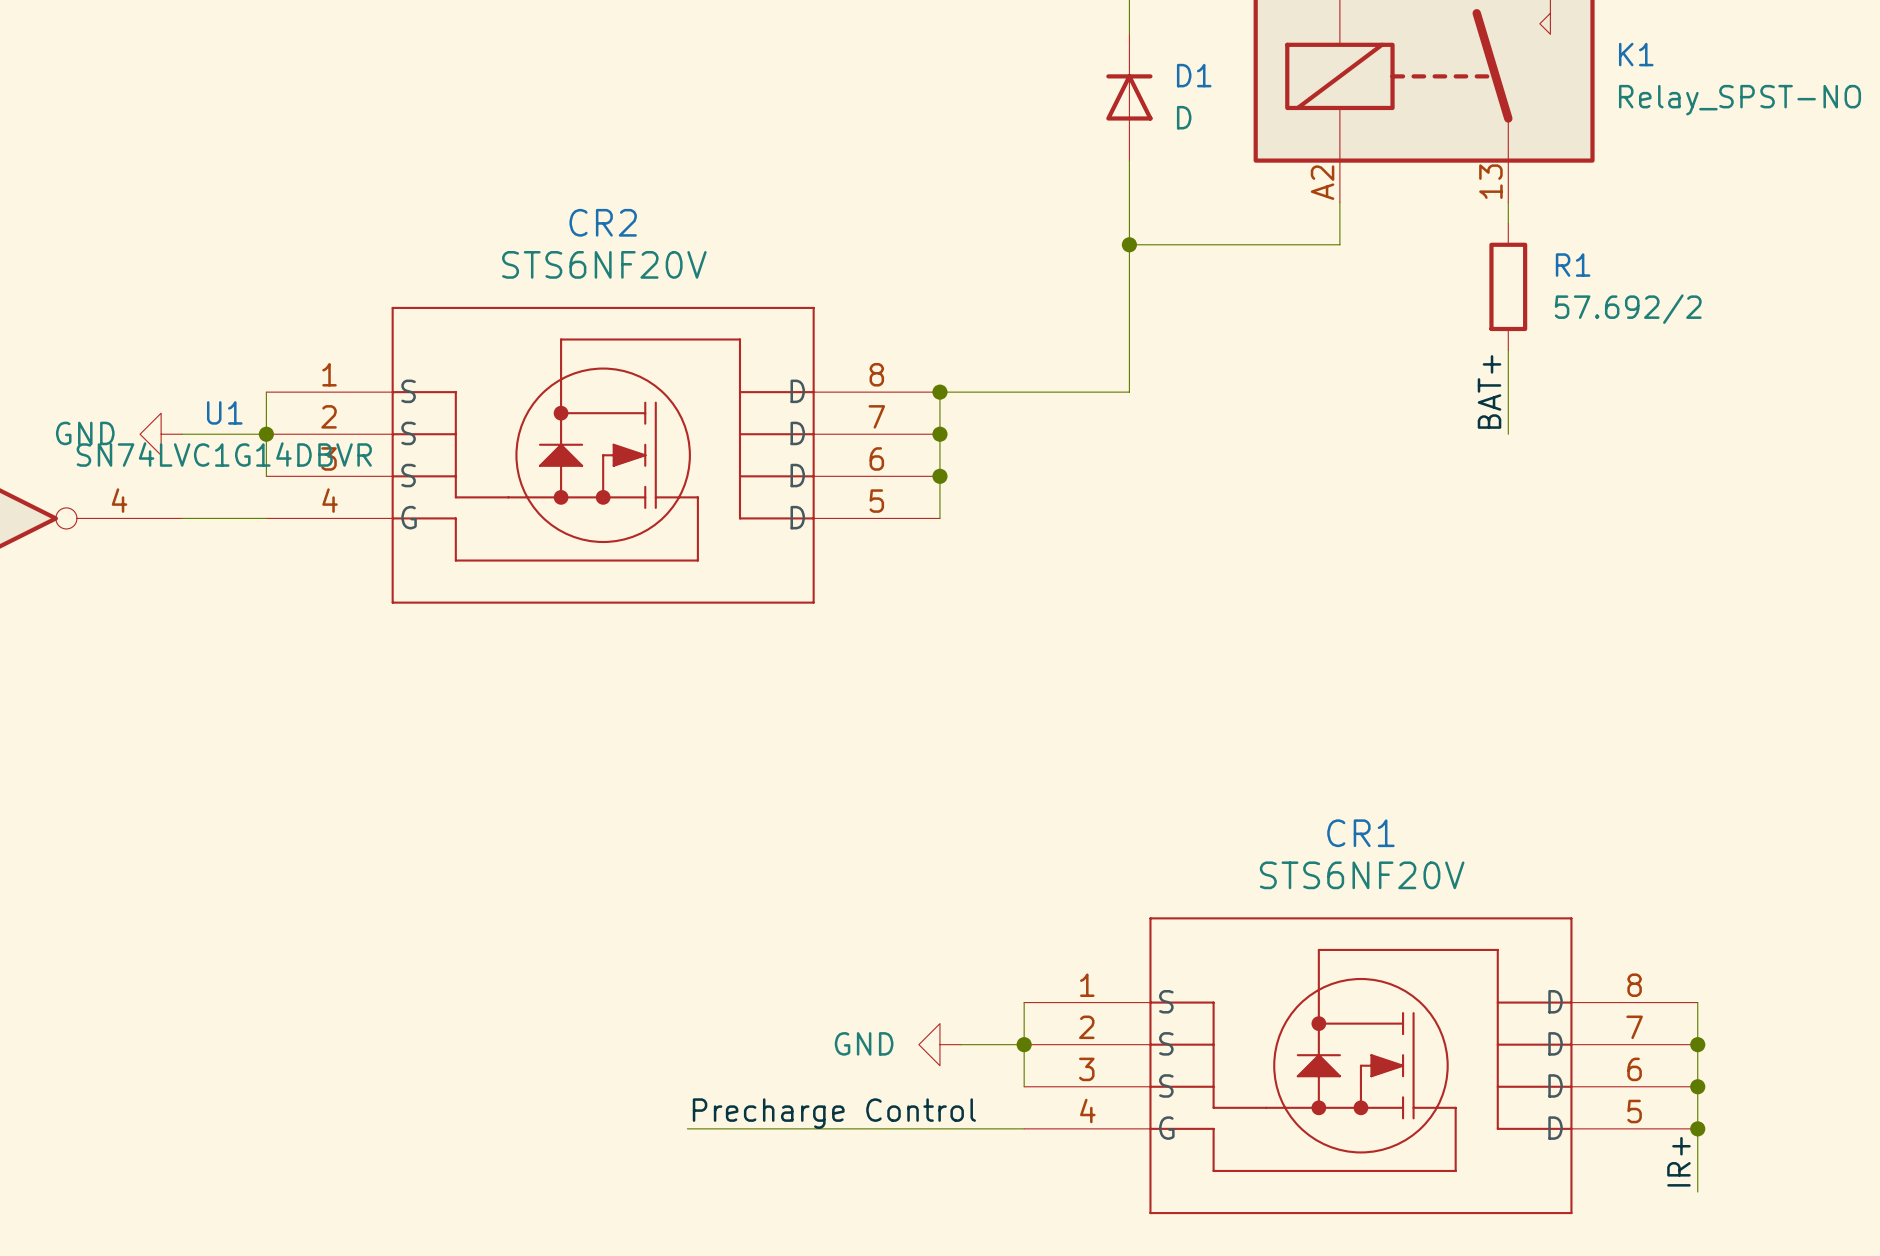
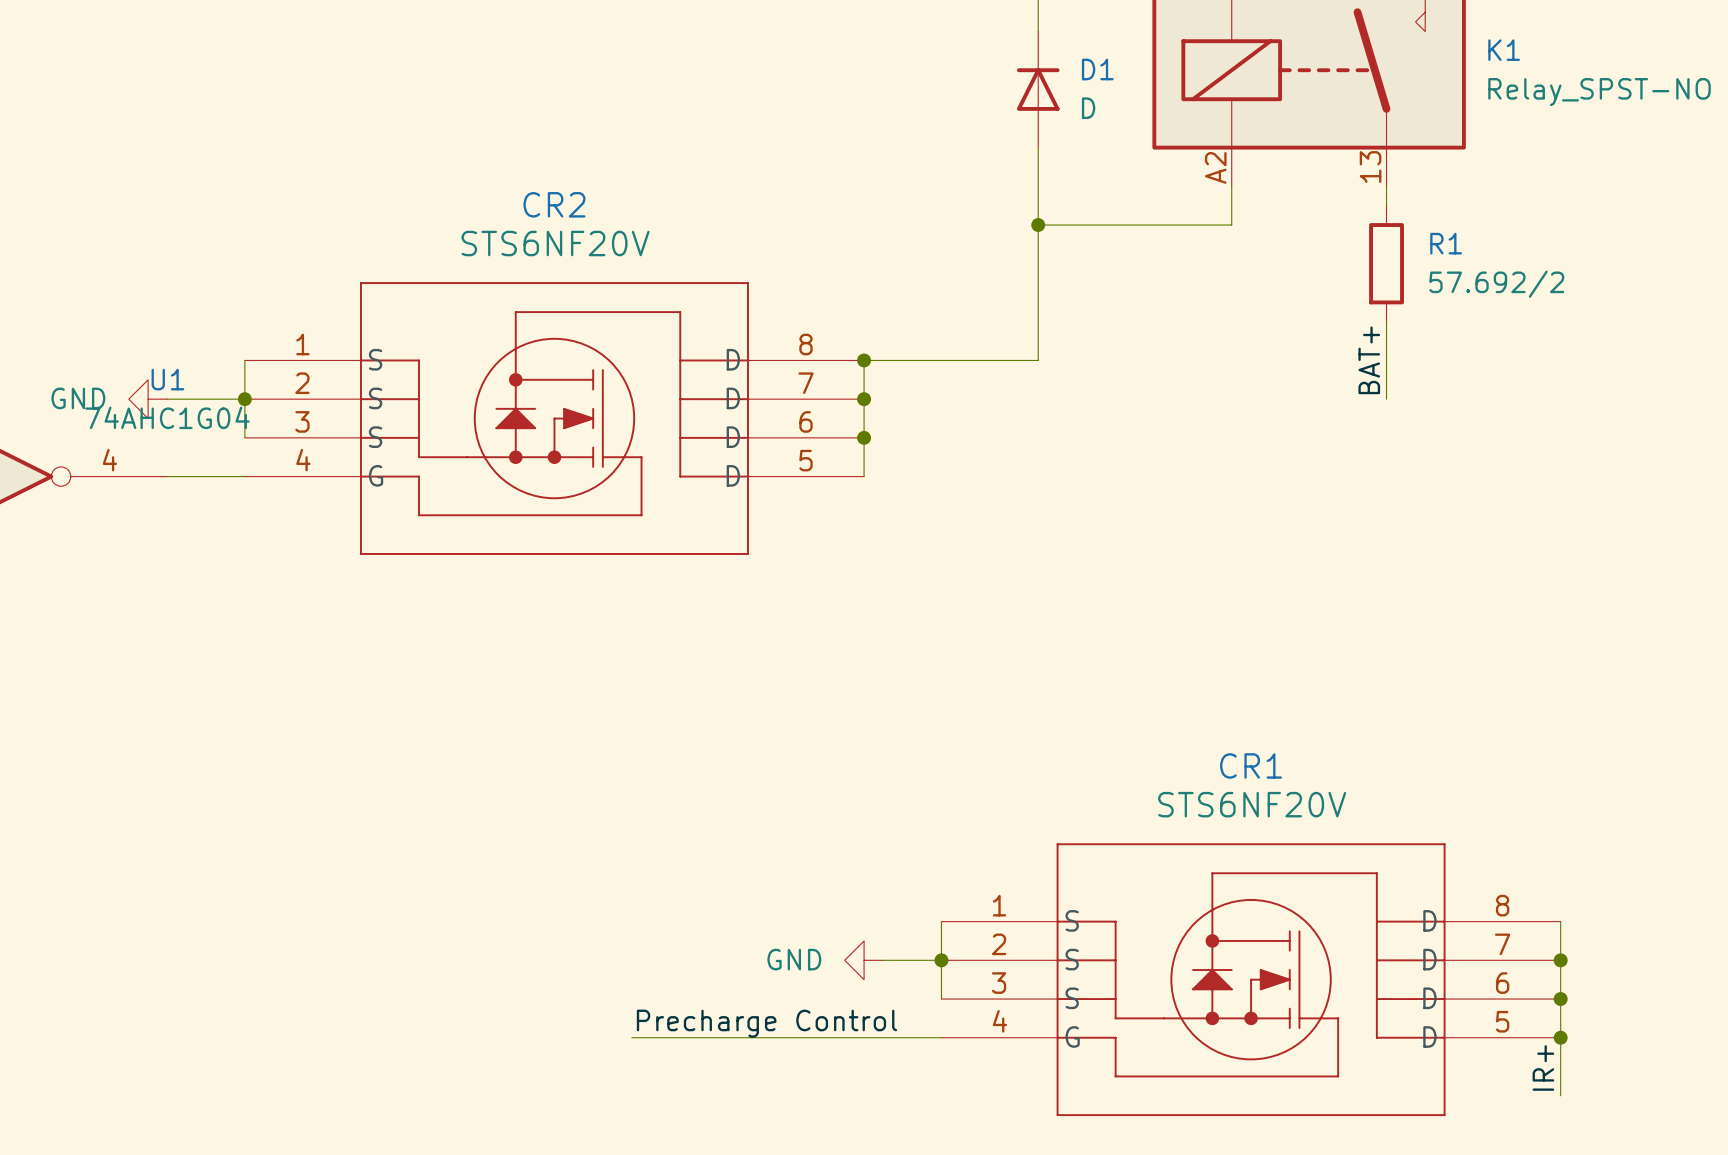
U1 name position: U1 (224, 412) -> U1 (167, 379)
U1 value: SN74LVC1G14DBVR (224, 454) -> 74AHC1G04 (167, 417)

